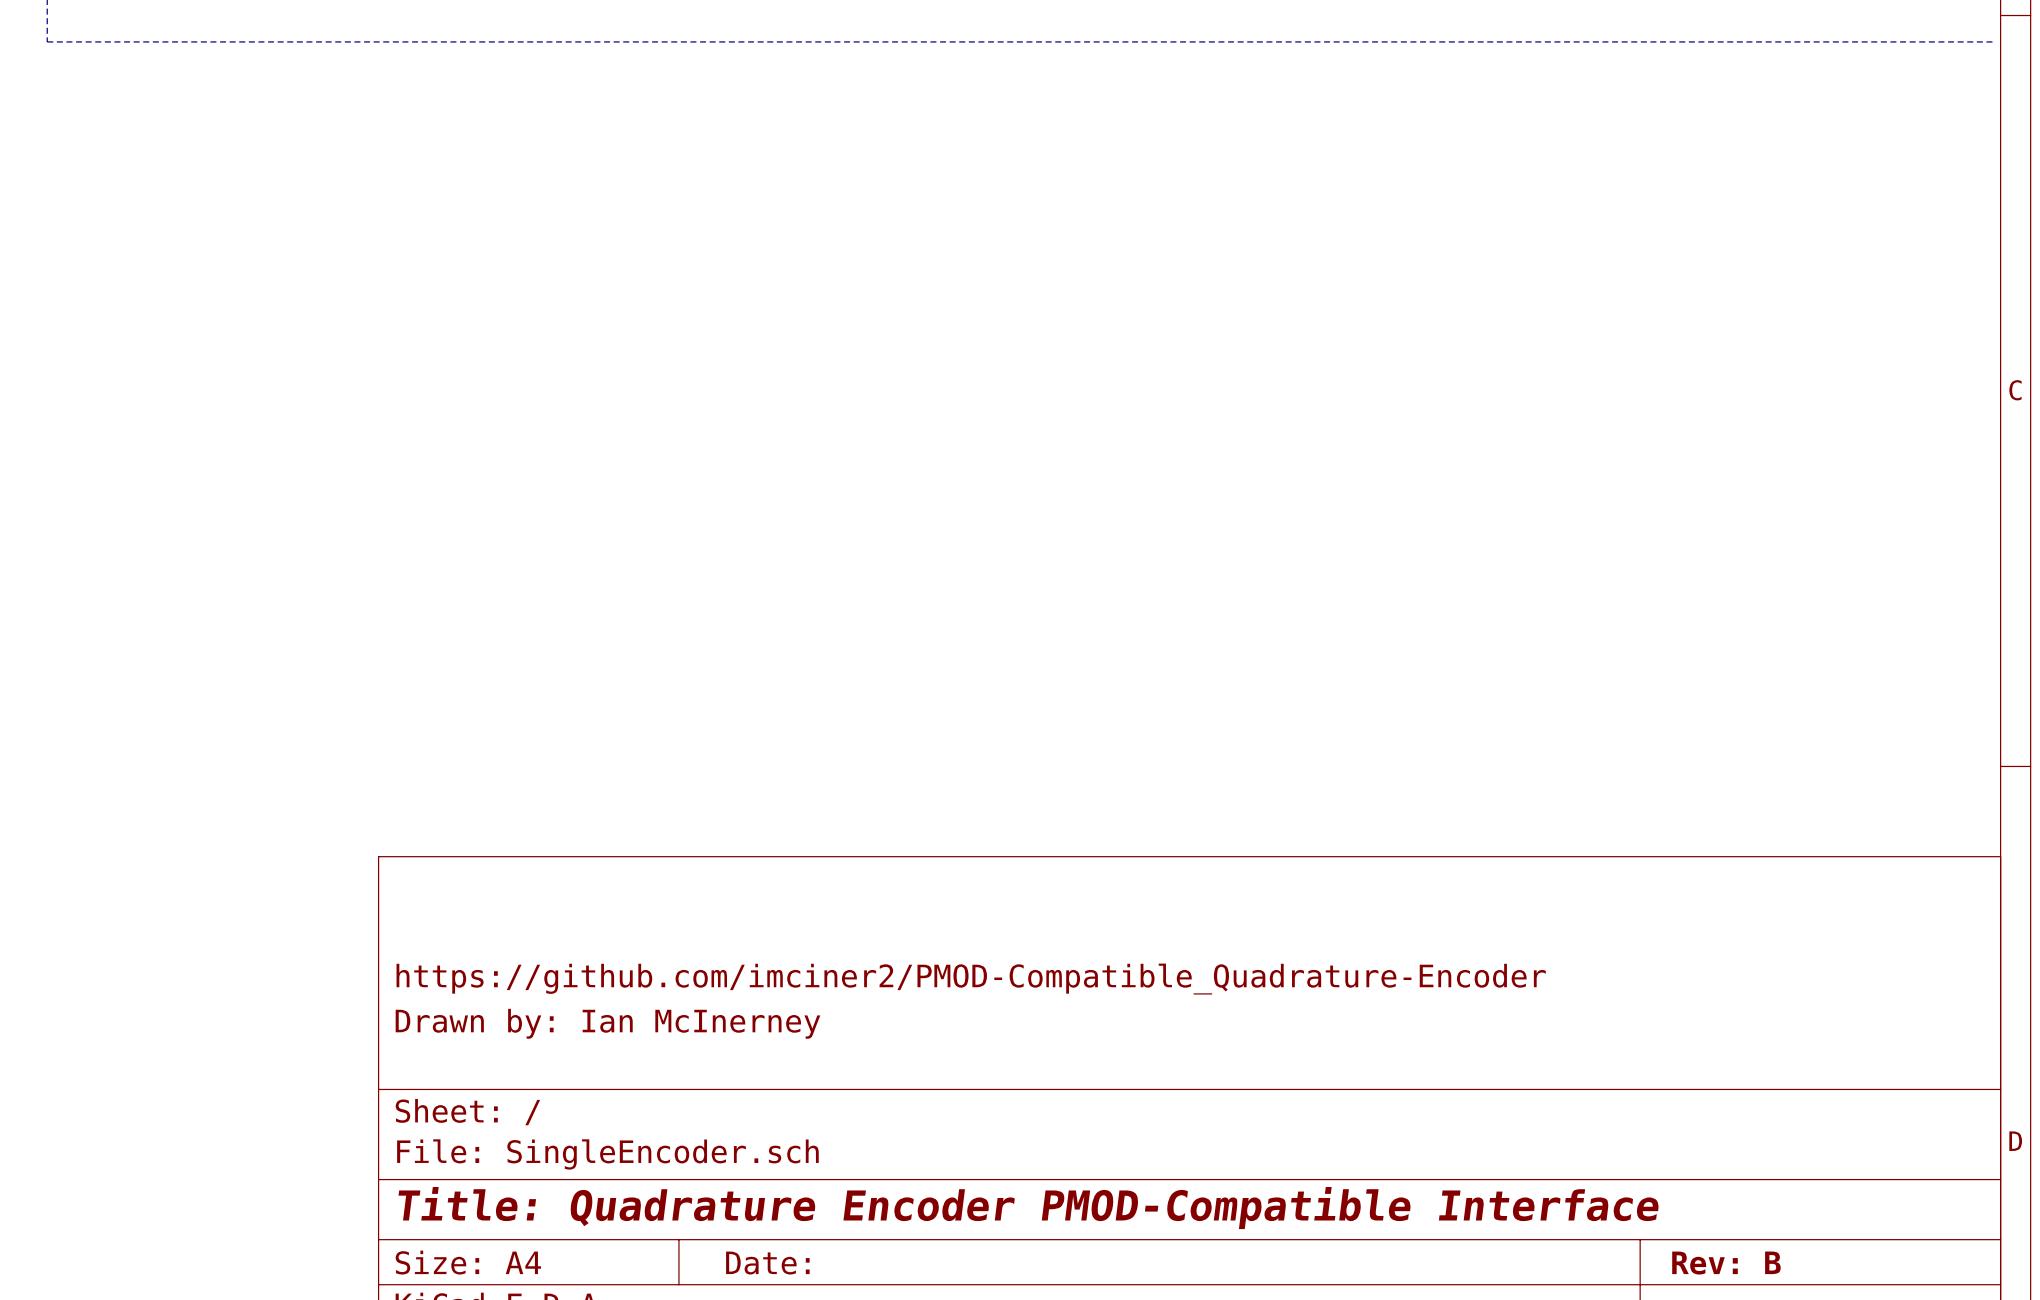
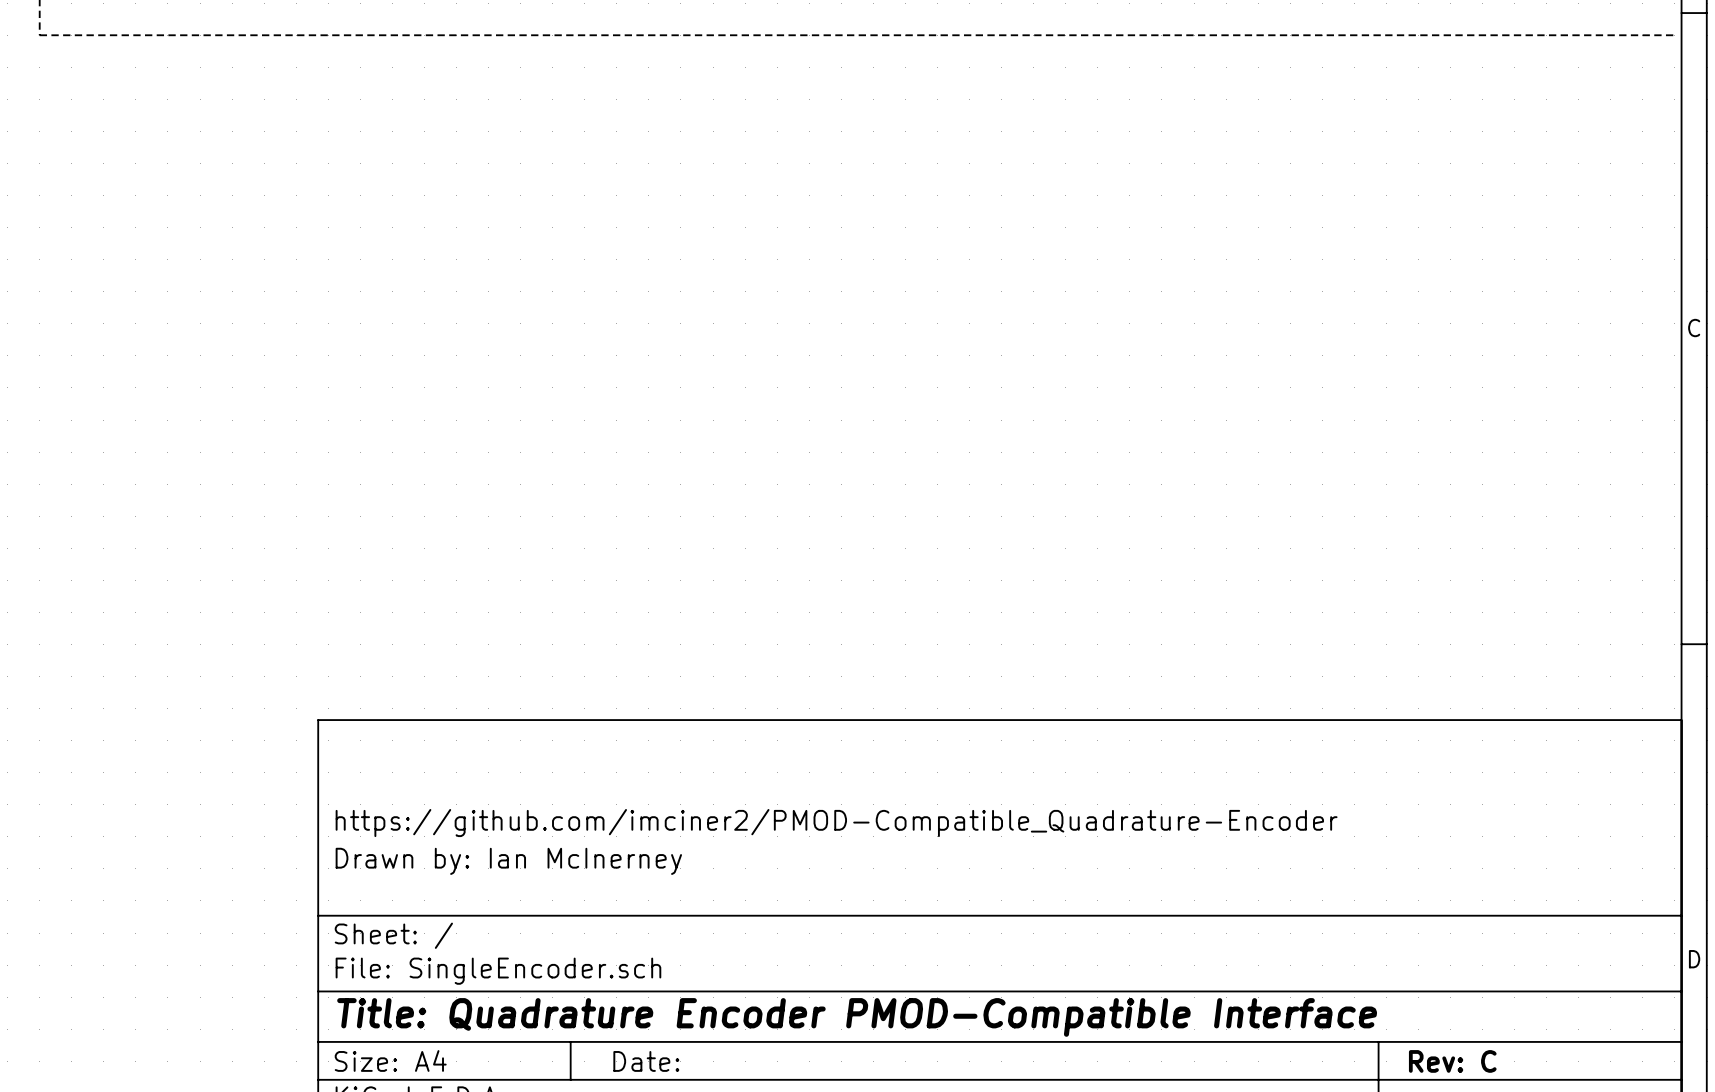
title block: Rev: B (1726, 1263) -> Rev: C (1452, 1061)

